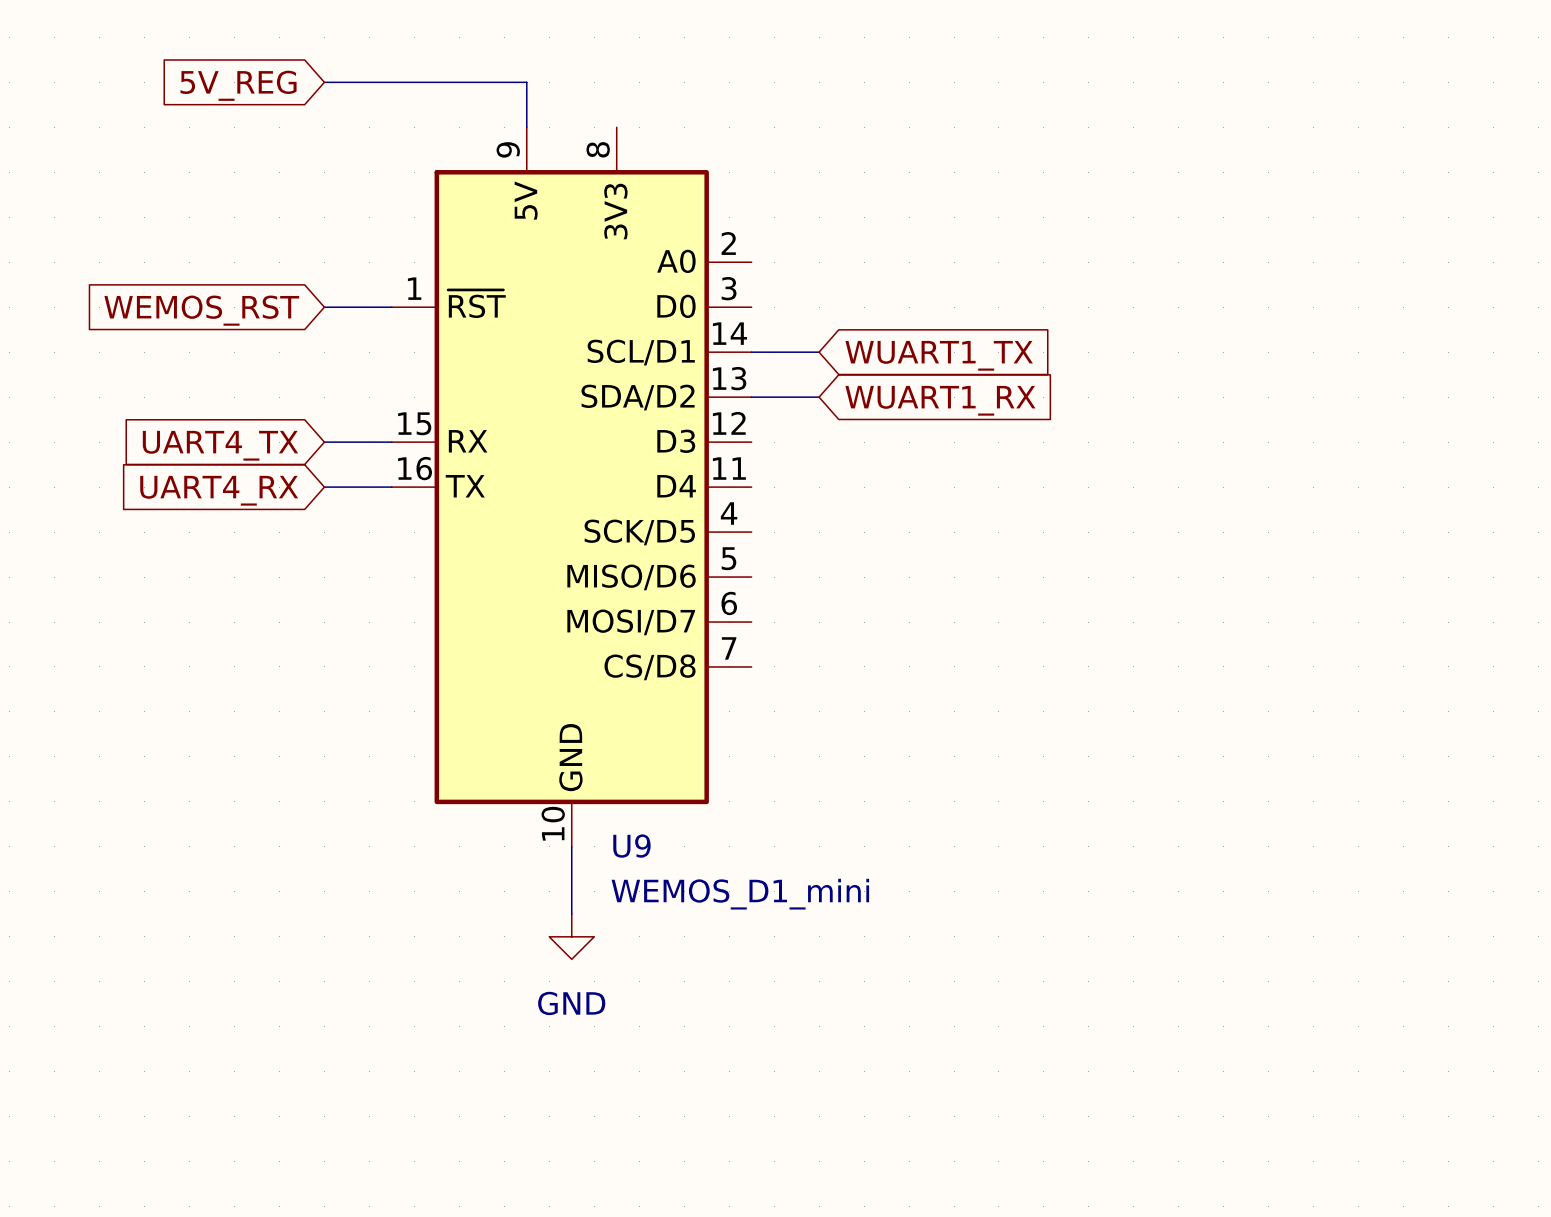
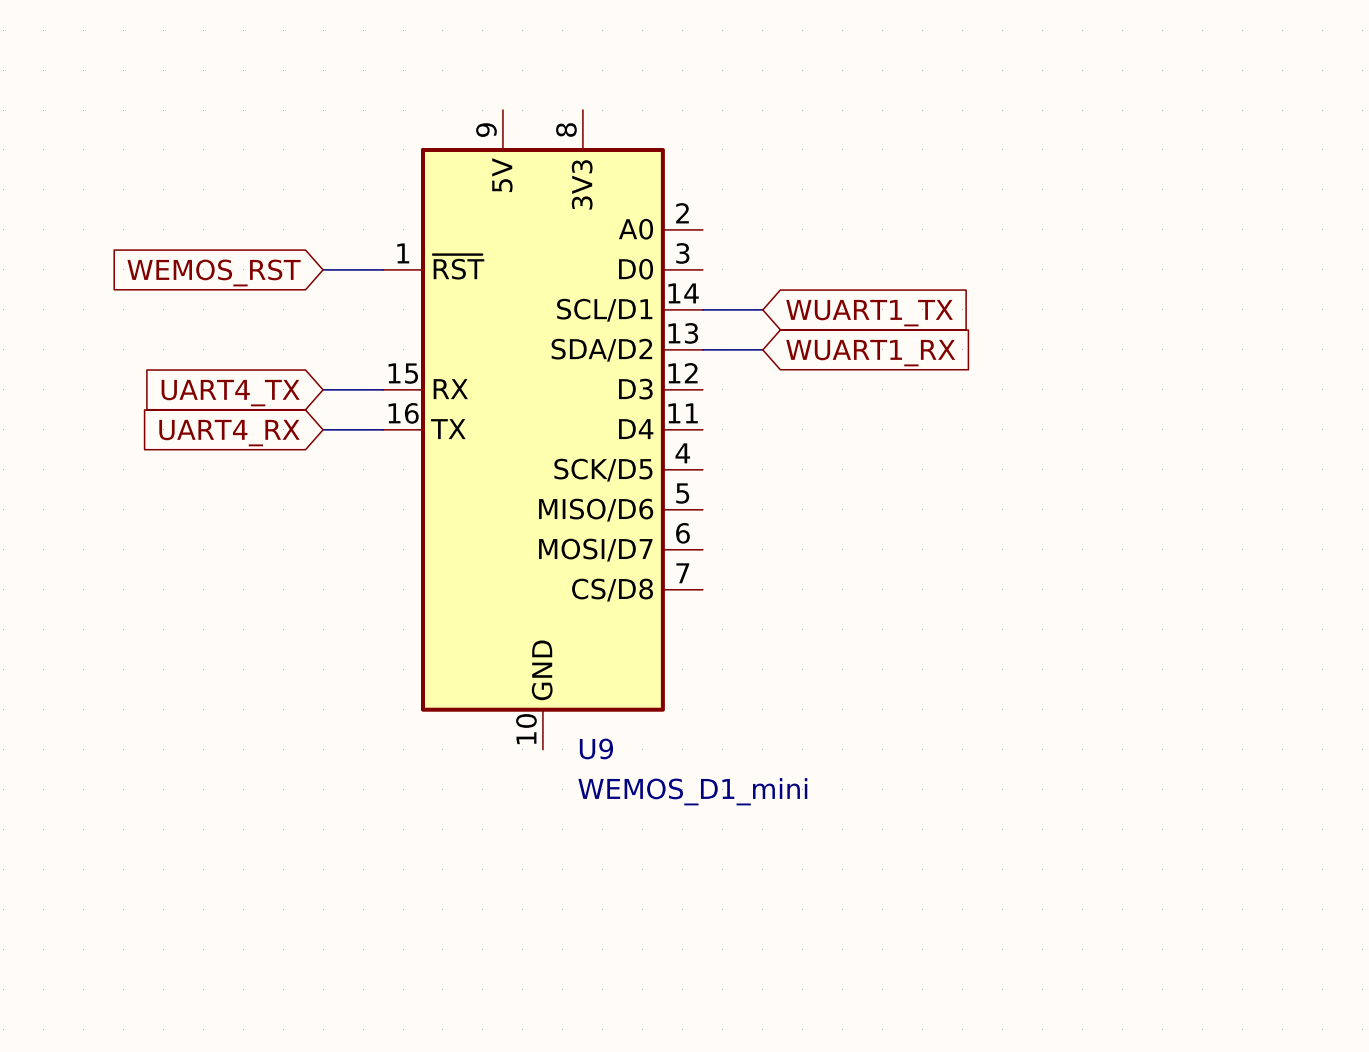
wire: (324, 82) (526, 82) (526, 127) -> none
global label: 5V_REG (238, 85) -> none
wire: (571, 846) (571, 914) -> none
power symbol: GND (571, 936) -> none

